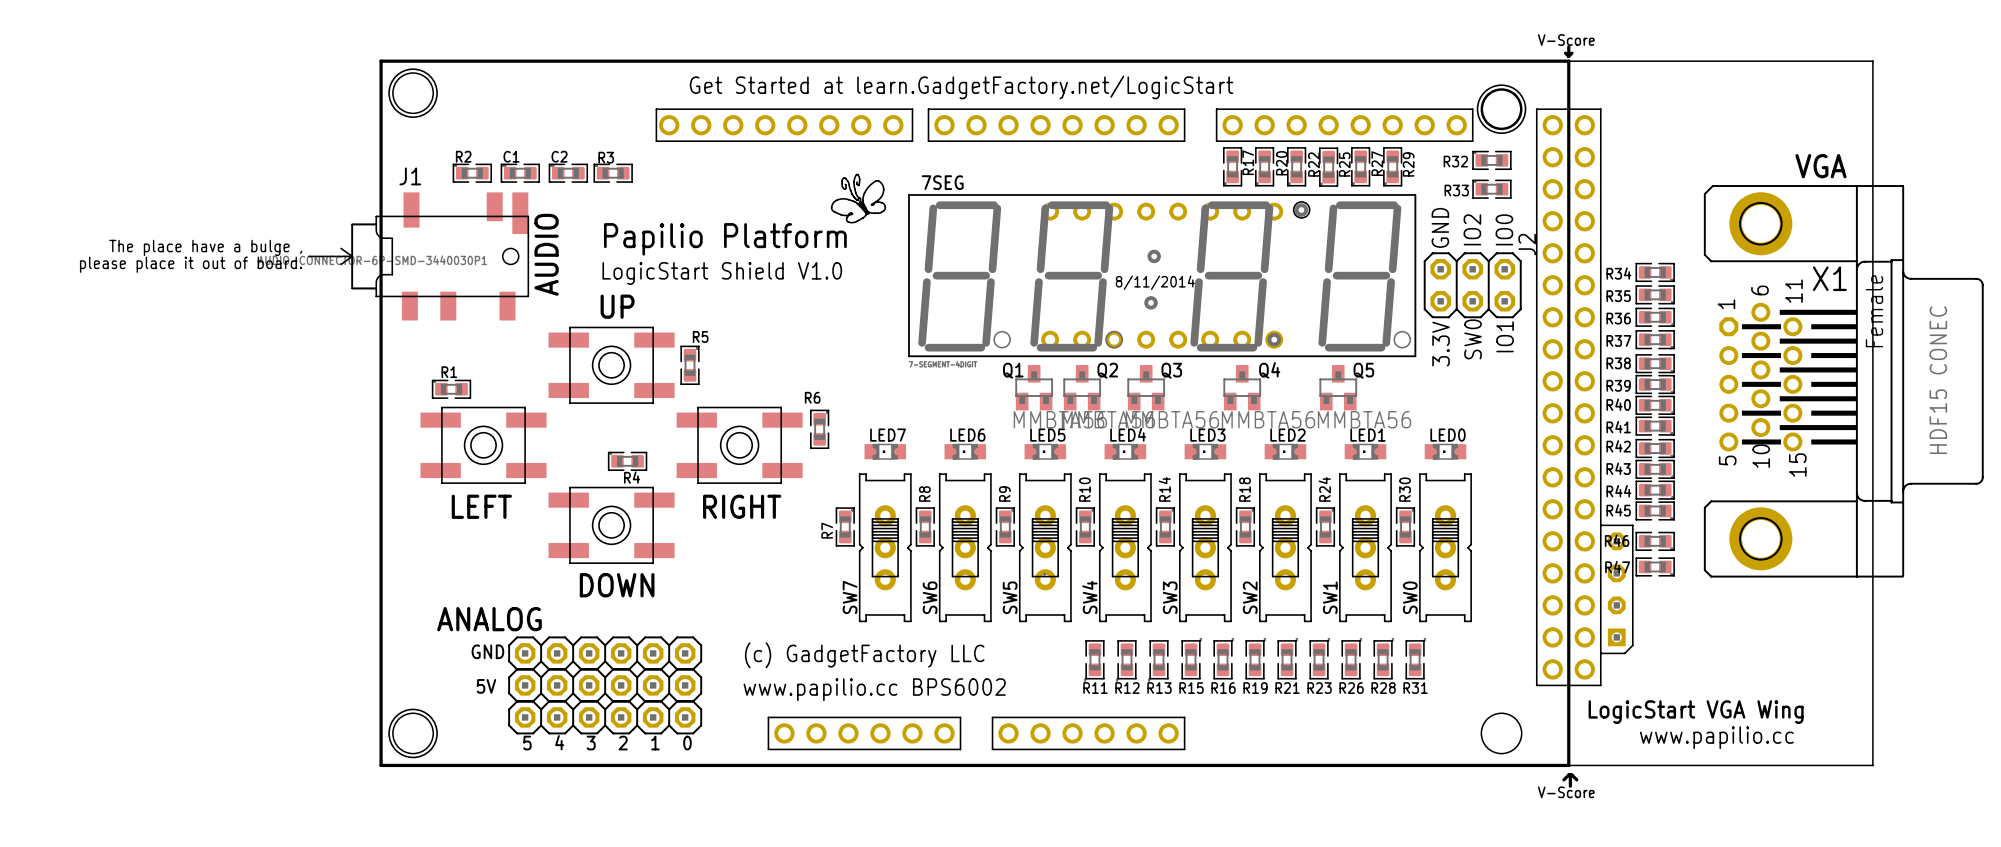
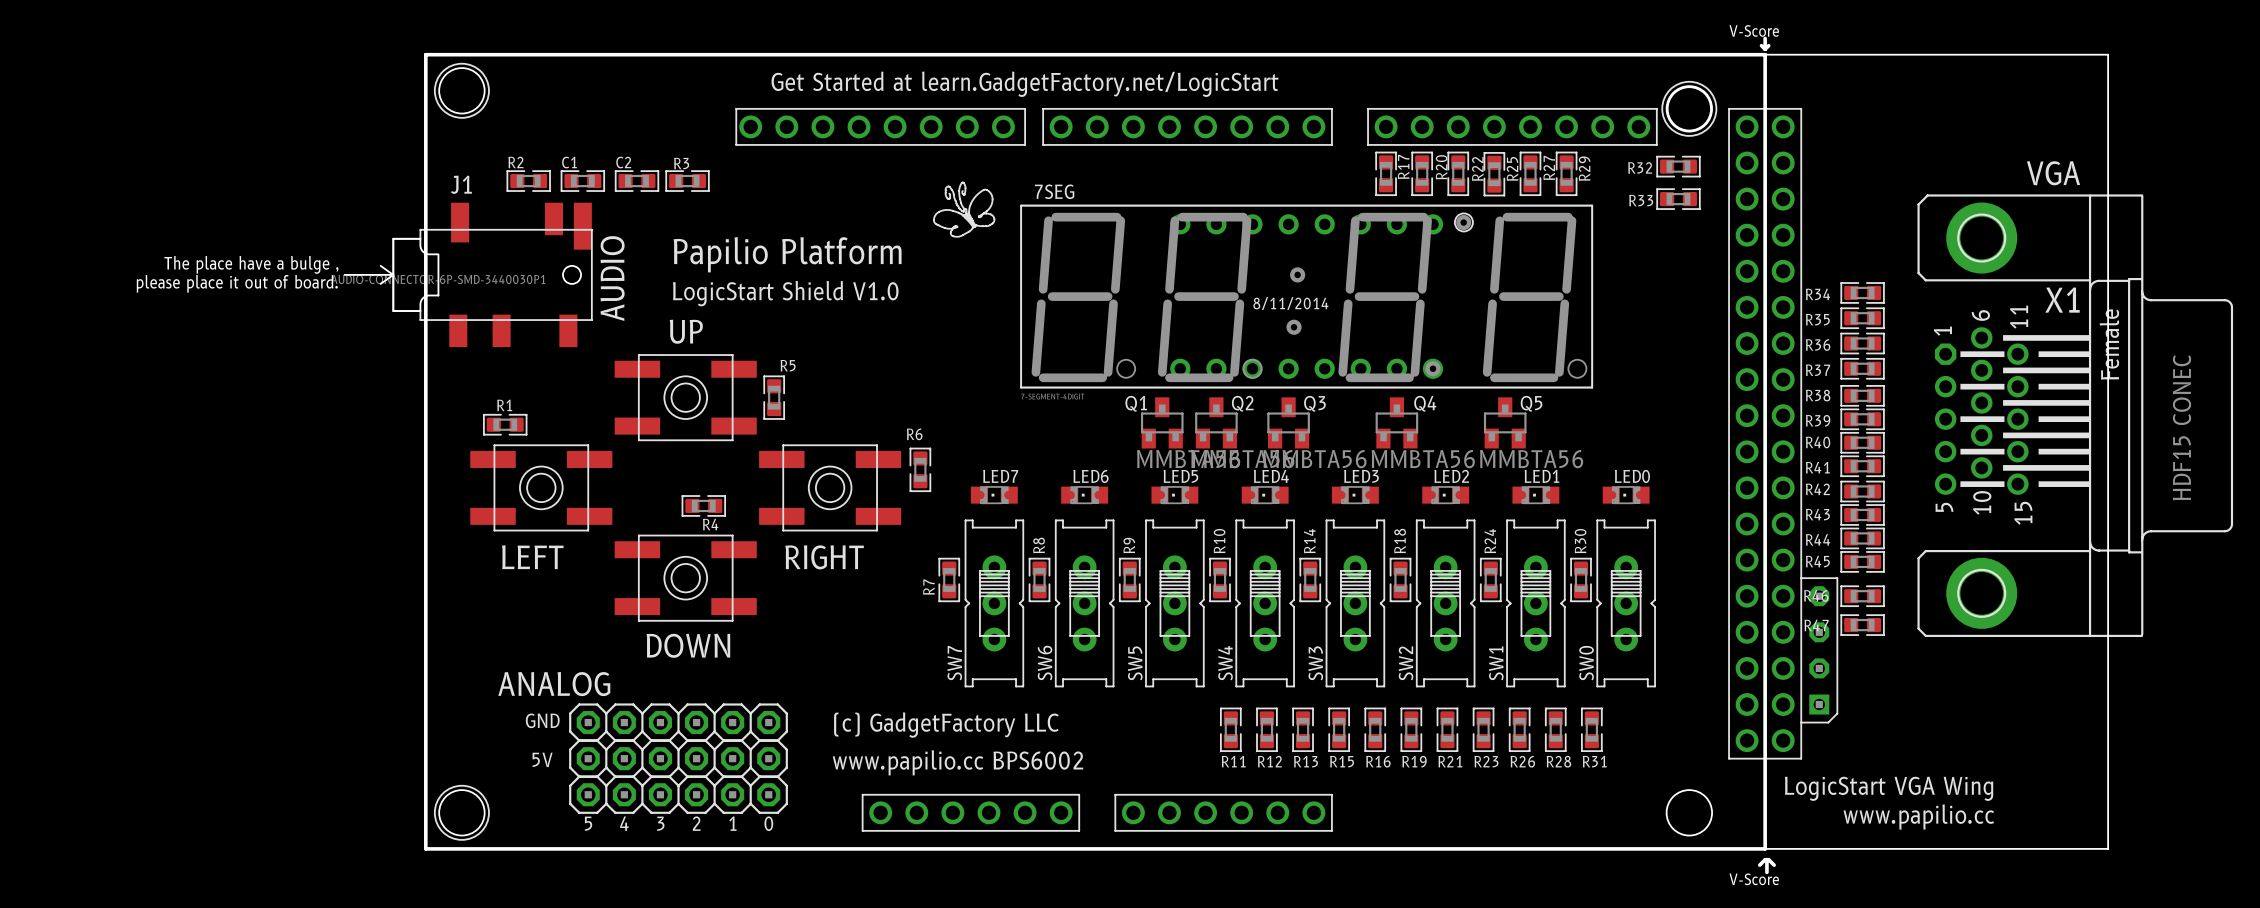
text: GND (1440, 227) -> none
text: IO2 (1472, 229) -> none
text: IO0 (1504, 229) -> none
J2: (1472, 285) -> none
text: IO1 (1505, 336) -> none
text: SW0 (1473, 339) -> none
text: 3.3V (1441, 344) -> none

